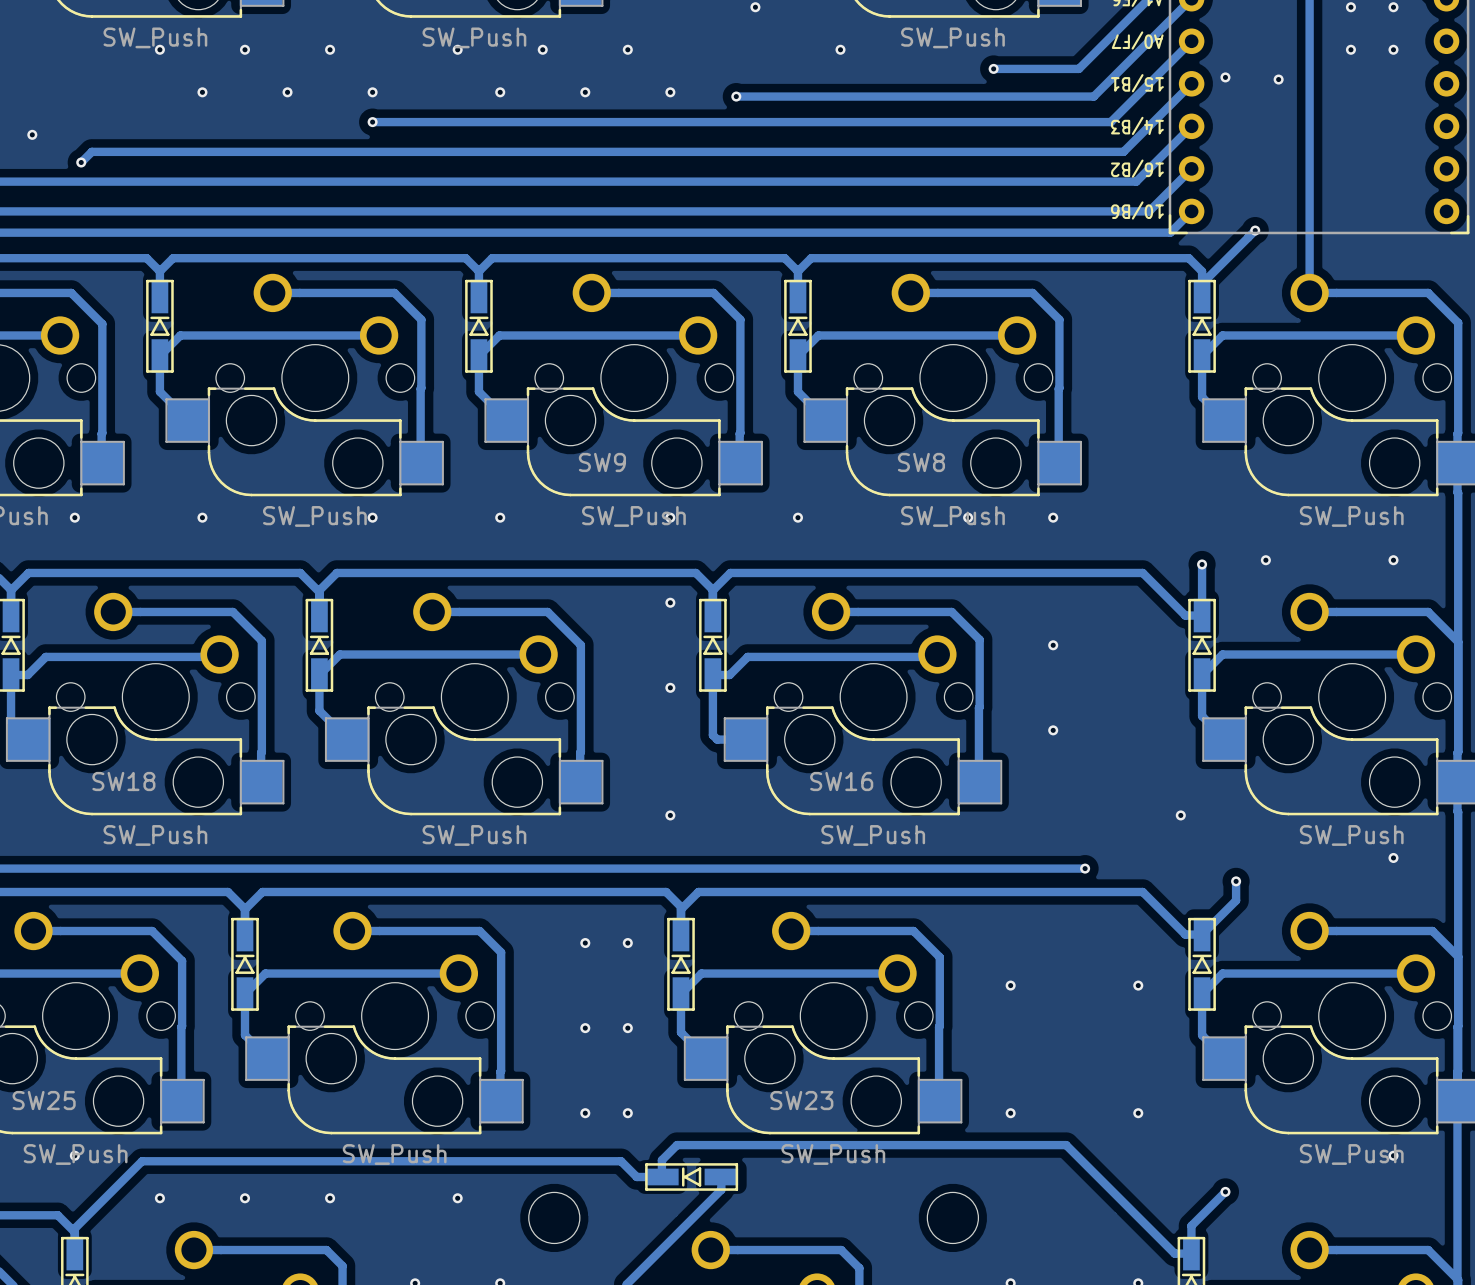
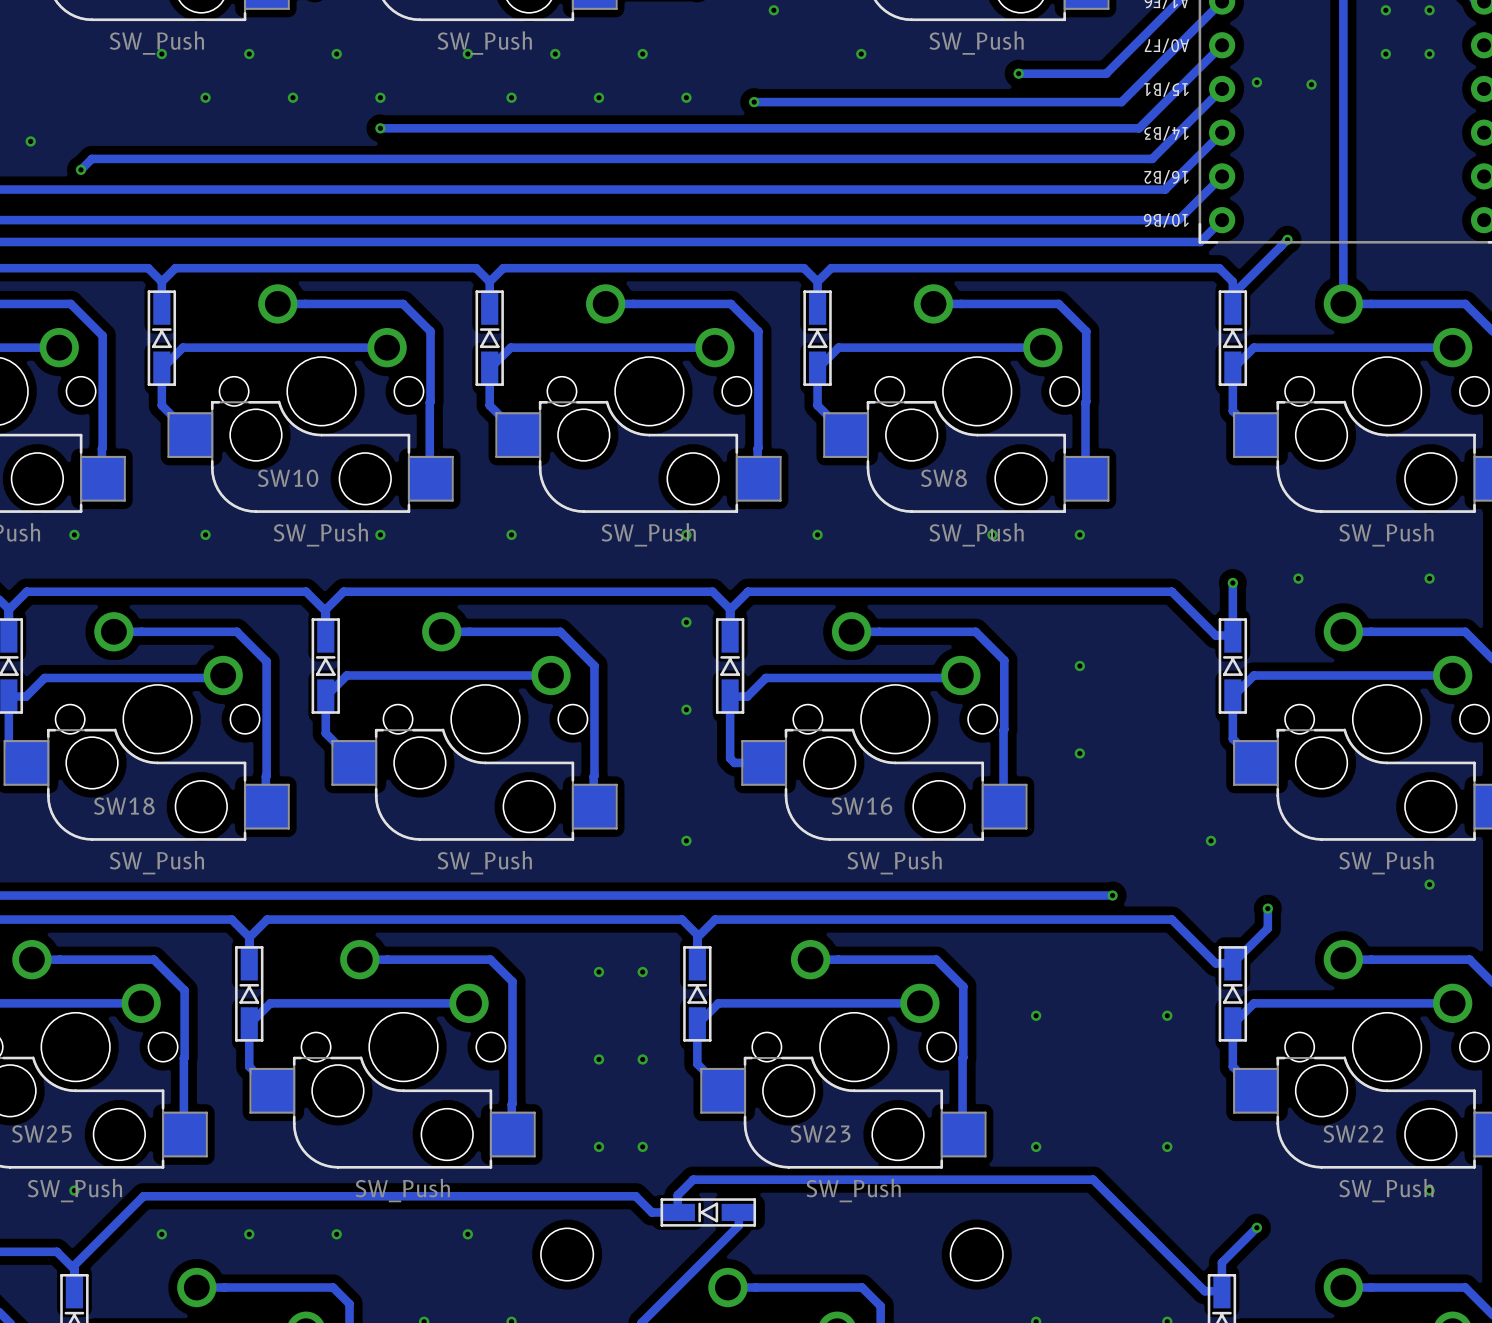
SW10 name: none -> SW10 (288, 478)
SW9 name: SW9 (602, 462) -> none
SW22 name: none -> SW22 (1353, 1133)

